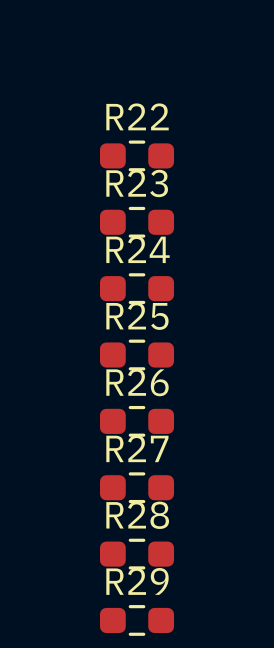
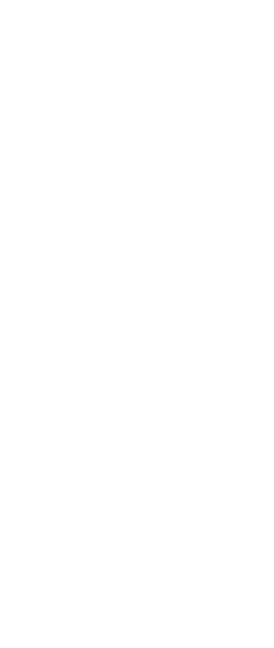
R22: (137, 155) -> none
R23: (137, 222) -> none
R24: (137, 288) -> none
R25: (137, 355) -> none
R26: (137, 421) -> none
R27: (137, 487) -> none
R28: (137, 554) -> none
R29: (137, 620) -> none

